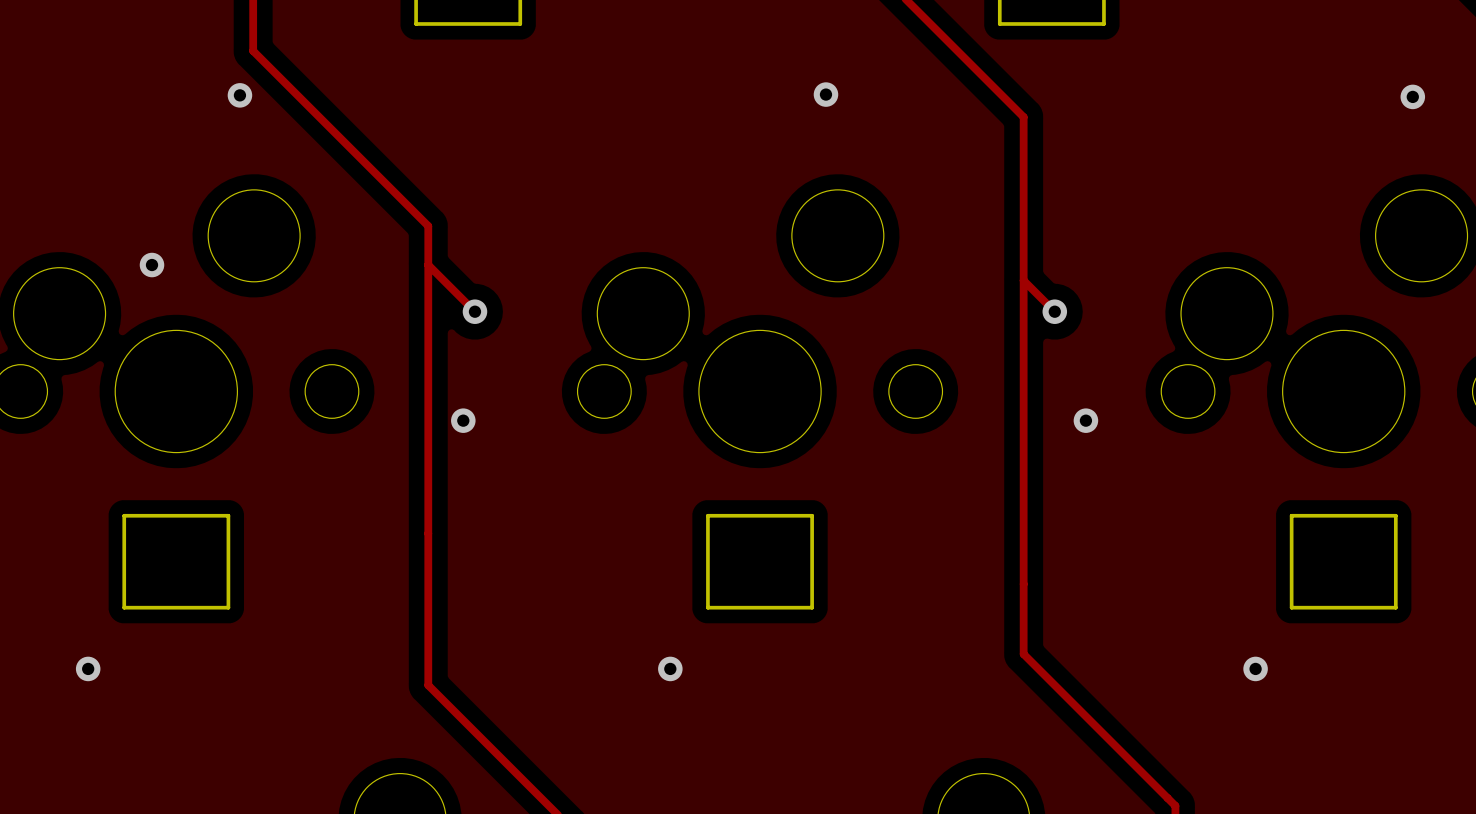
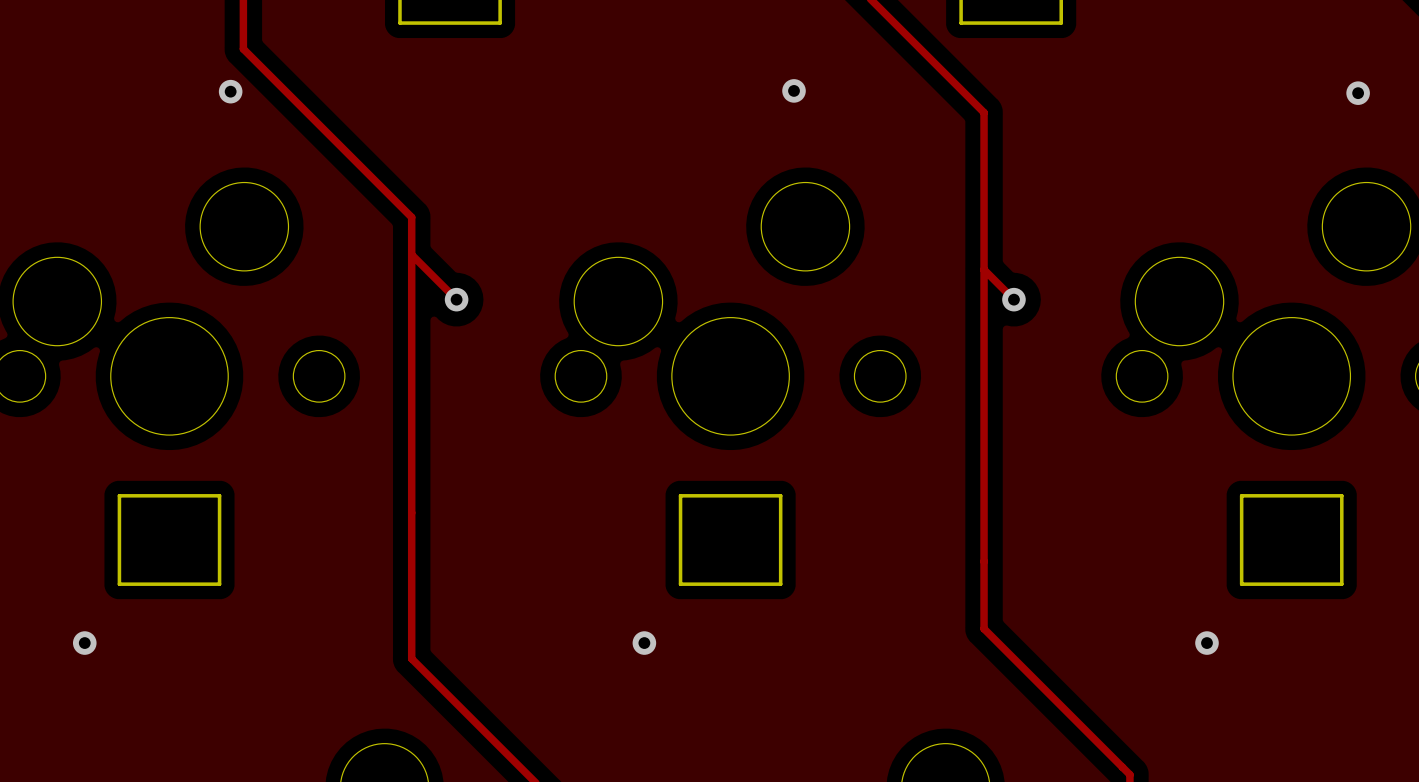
via: (151, 265) -> none
via: (463, 420) -> none
via: (1085, 420) -> none

